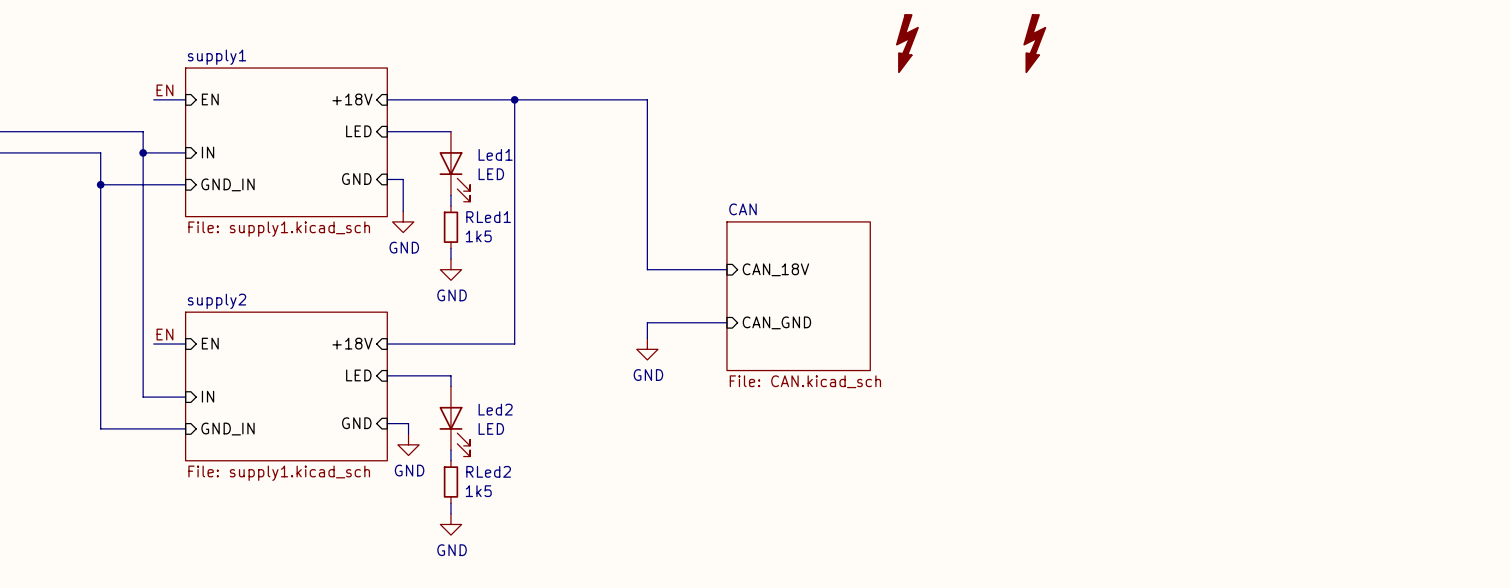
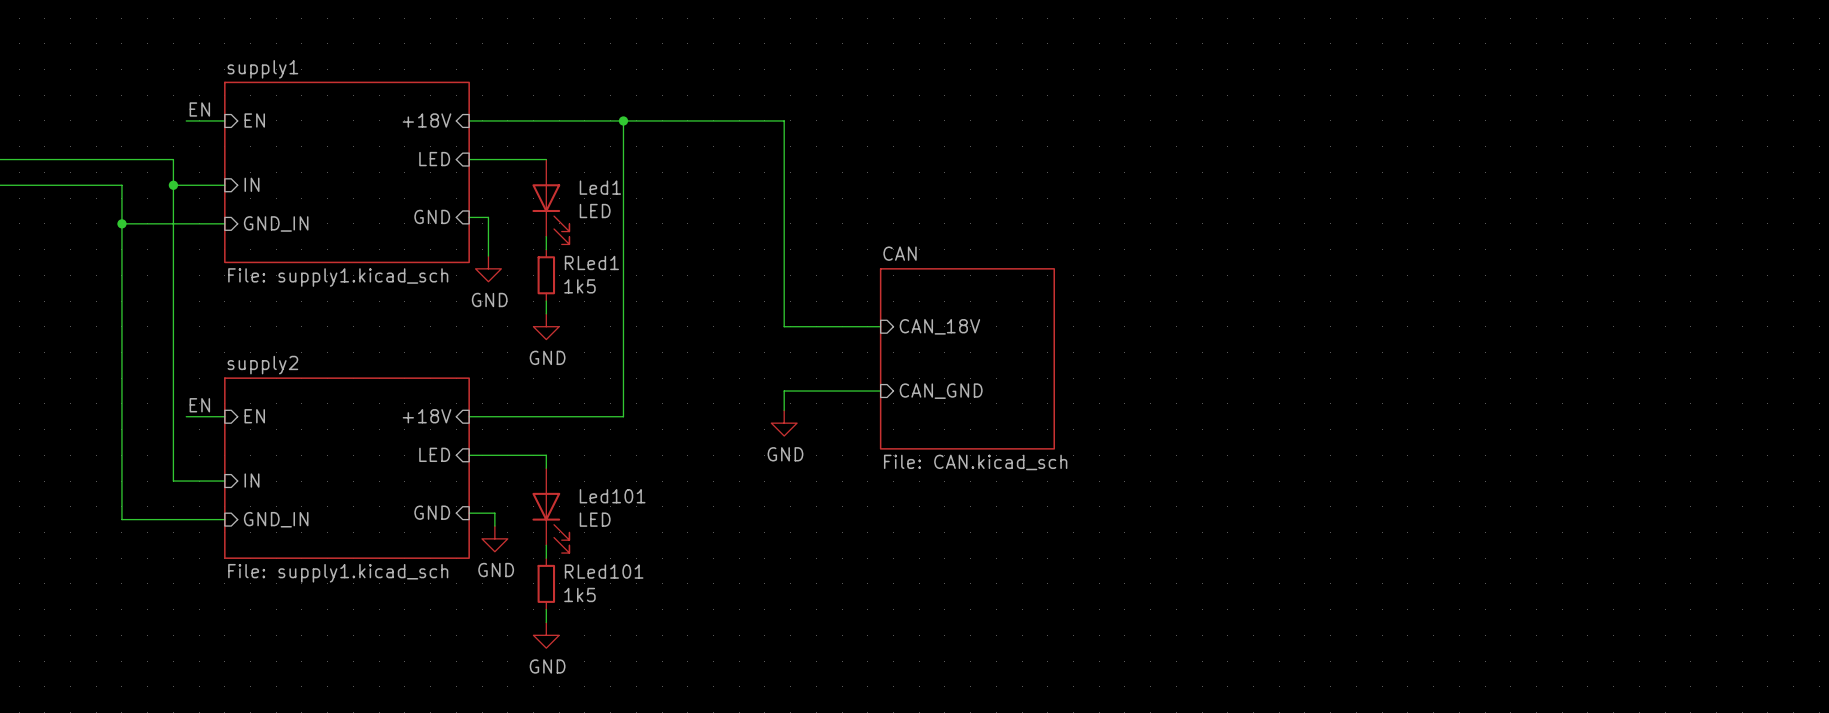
part: (907, 43) -> none
part: (1034, 43) -> none
Led2 name: Led2 (495, 409) -> Led101 (612, 496)
RLed2 name: RLed2 (488, 471) -> RLed101 (604, 571)

